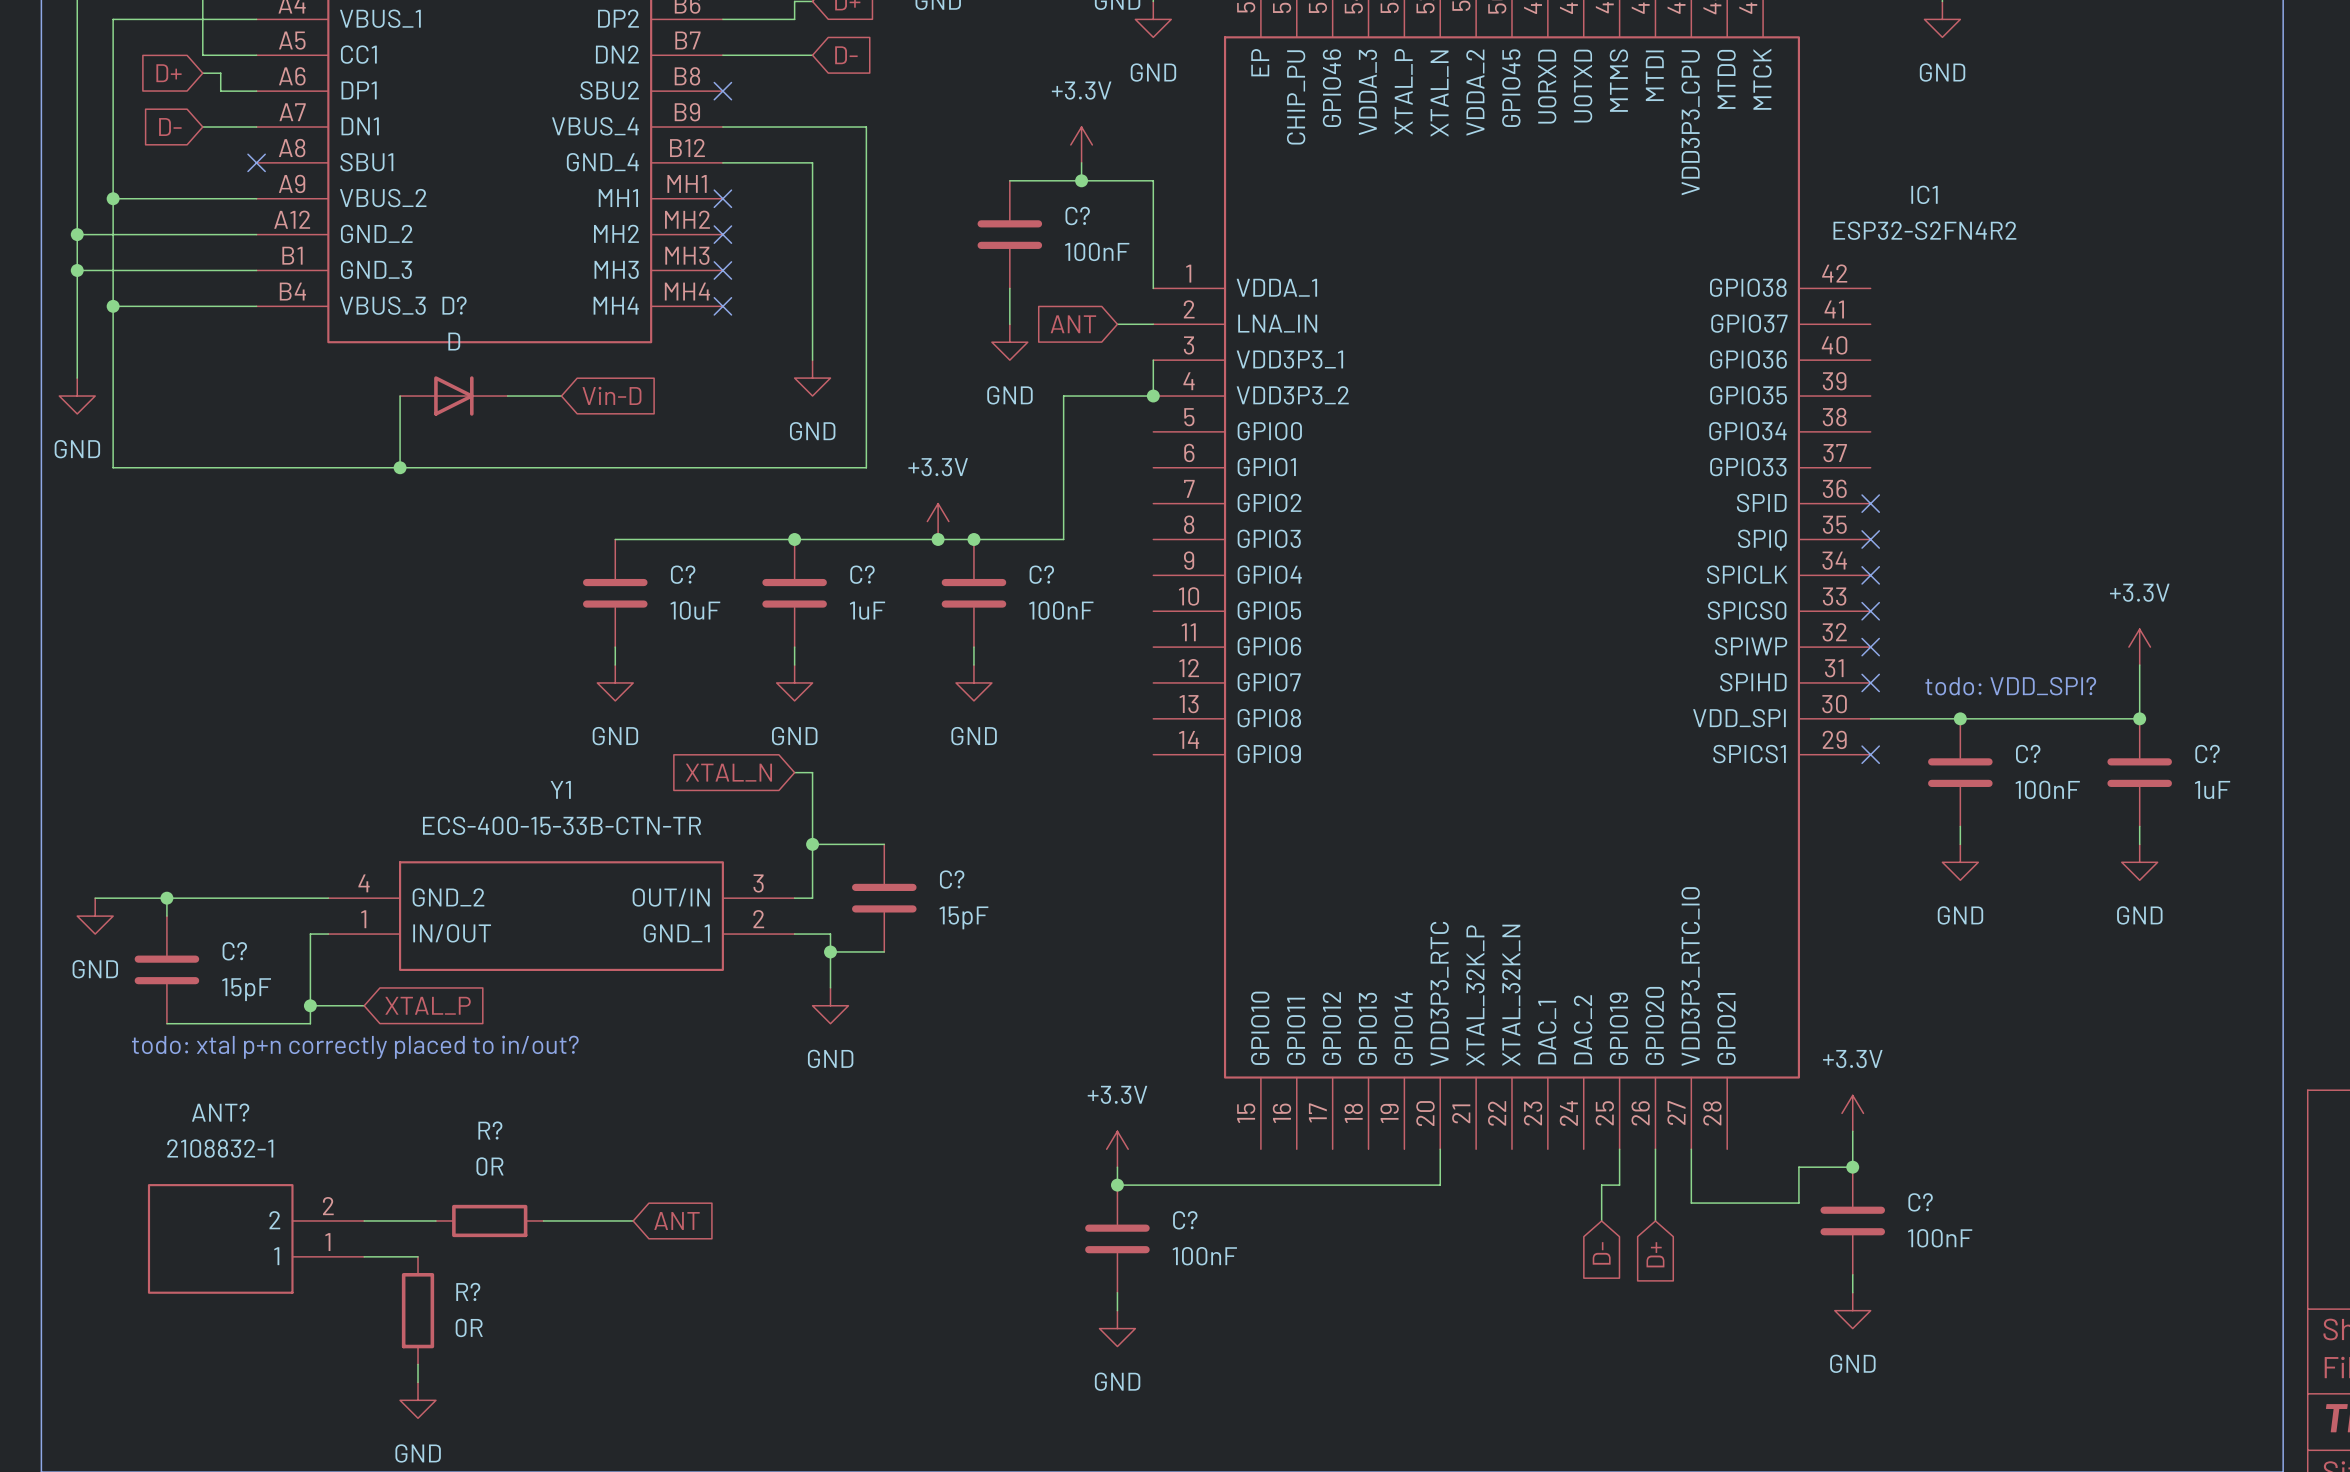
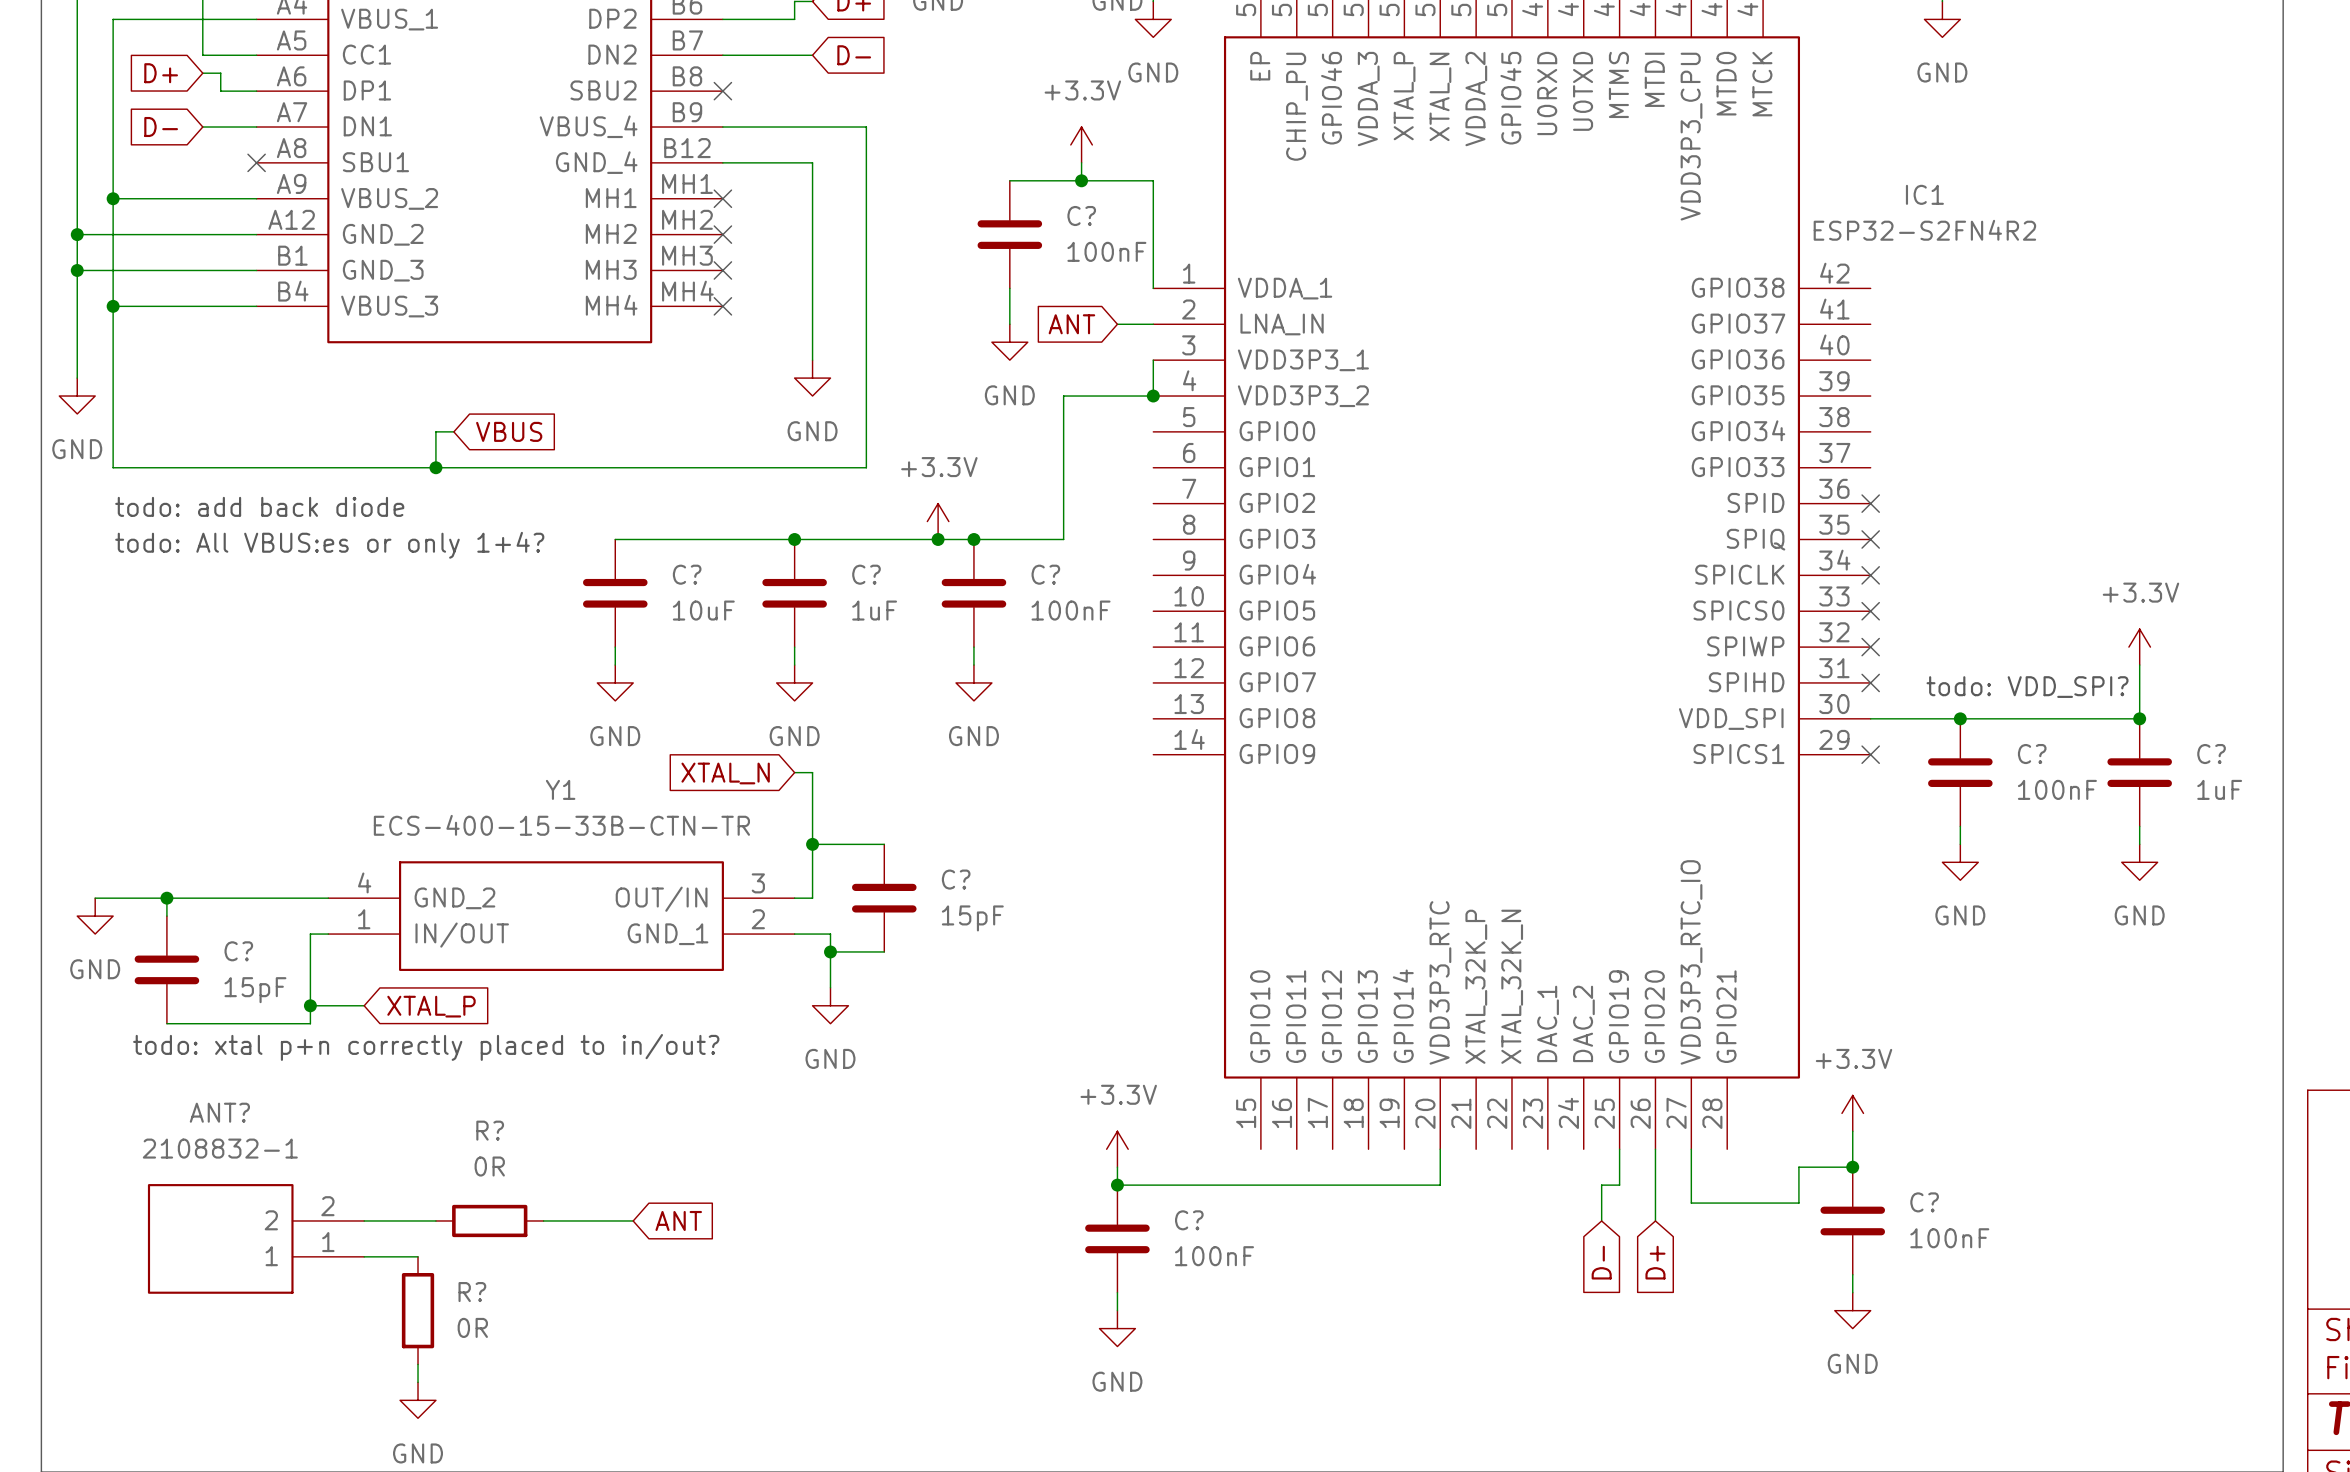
global label: Vin-D (611, 395) -> none
wire: (400, 396) (400, 467) -> none
D?: D (453, 396) -> none
wire: (507, 396) (561, 396) -> none
wire: none -> (453, 431) (435, 431) (435, 467)
global label: none -> VBUS (509, 431)
junction position: (400, 467) -> (435, 467)
text: none -> todo: add back diode (259, 506)
text: none -> todo: All VBUS:es or only 1+4? (329, 545)

